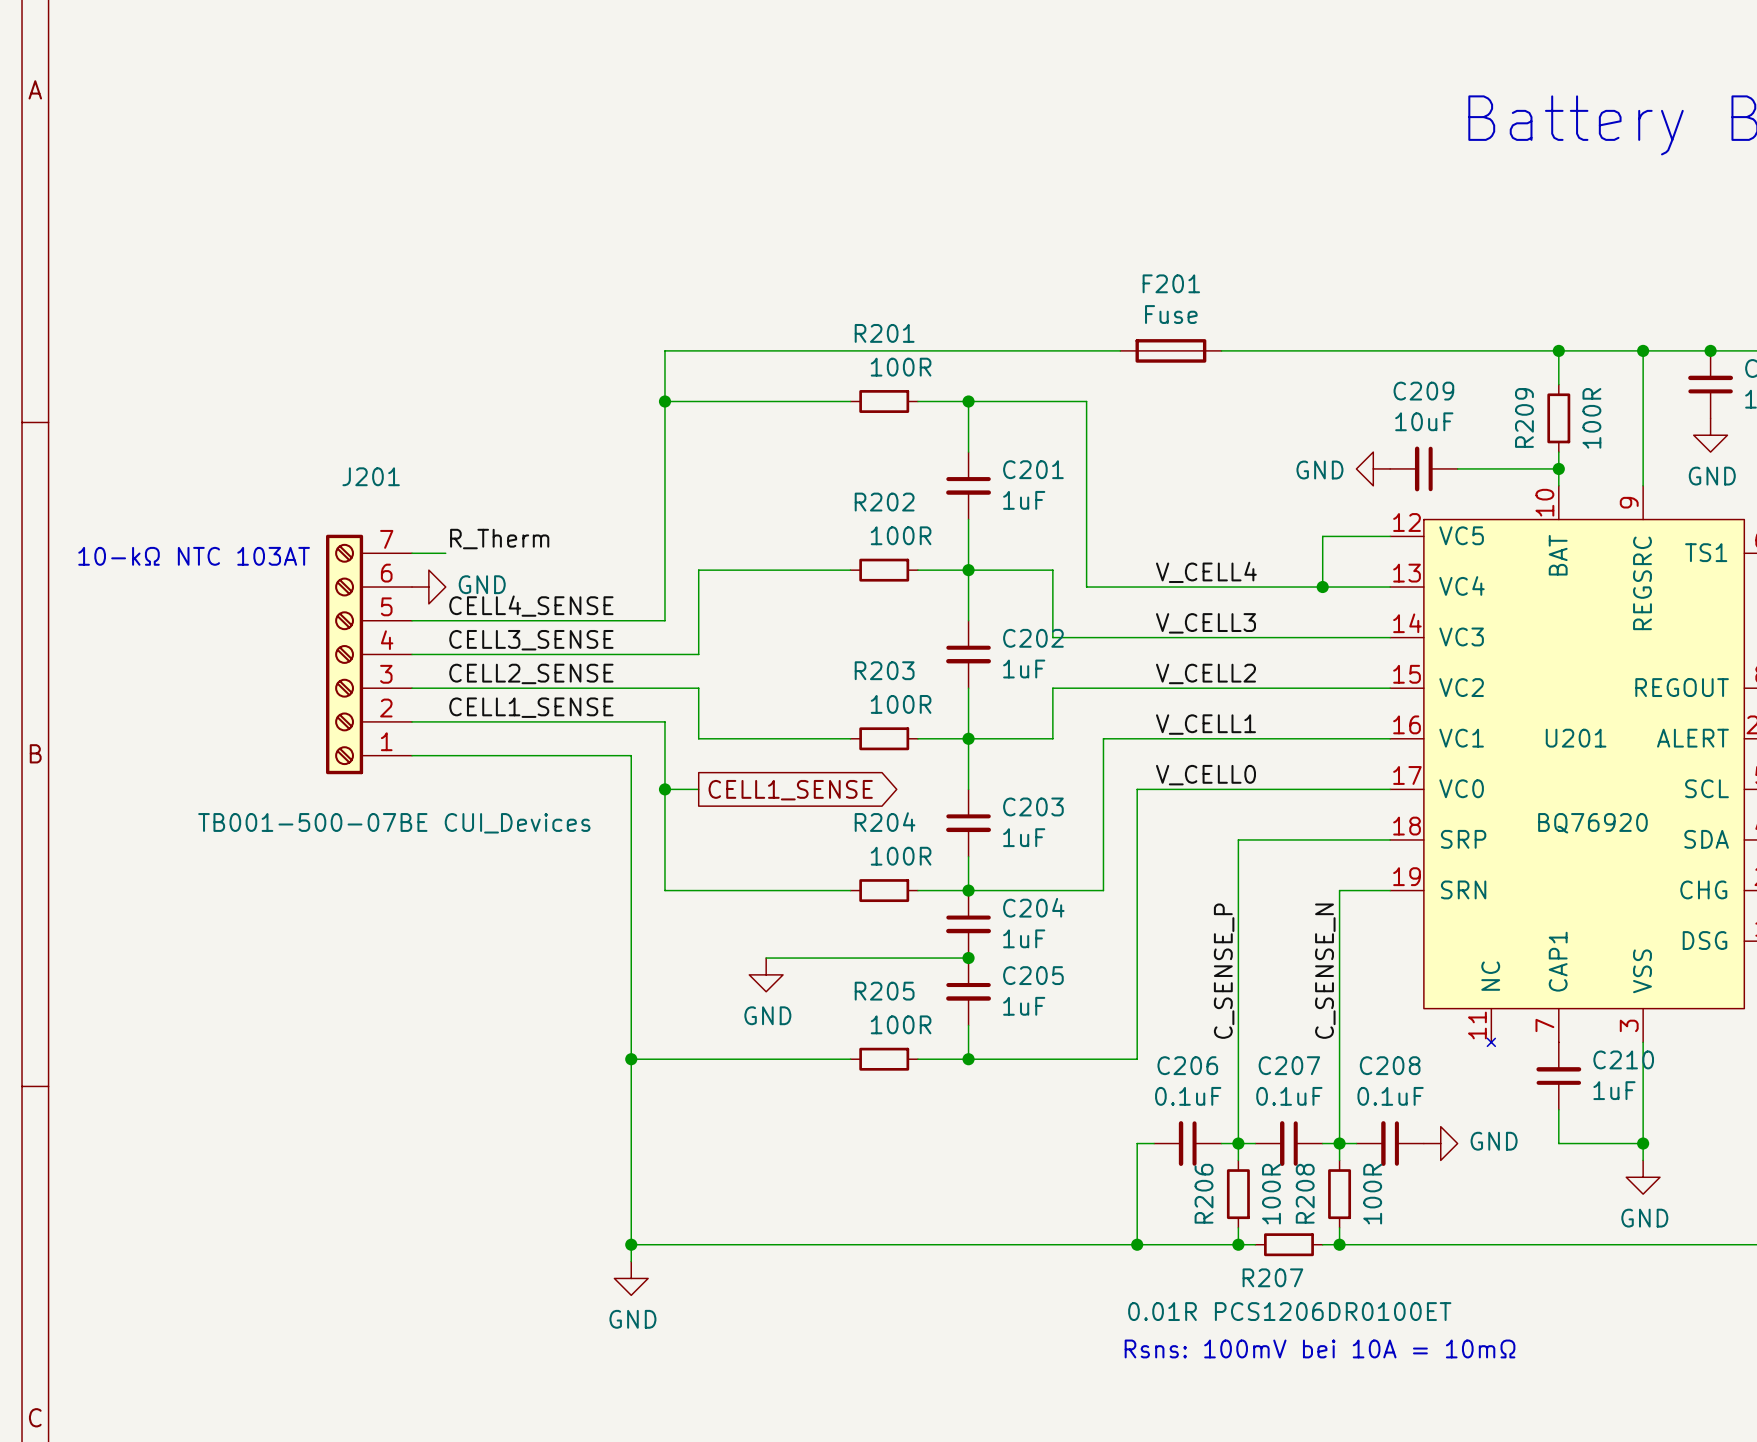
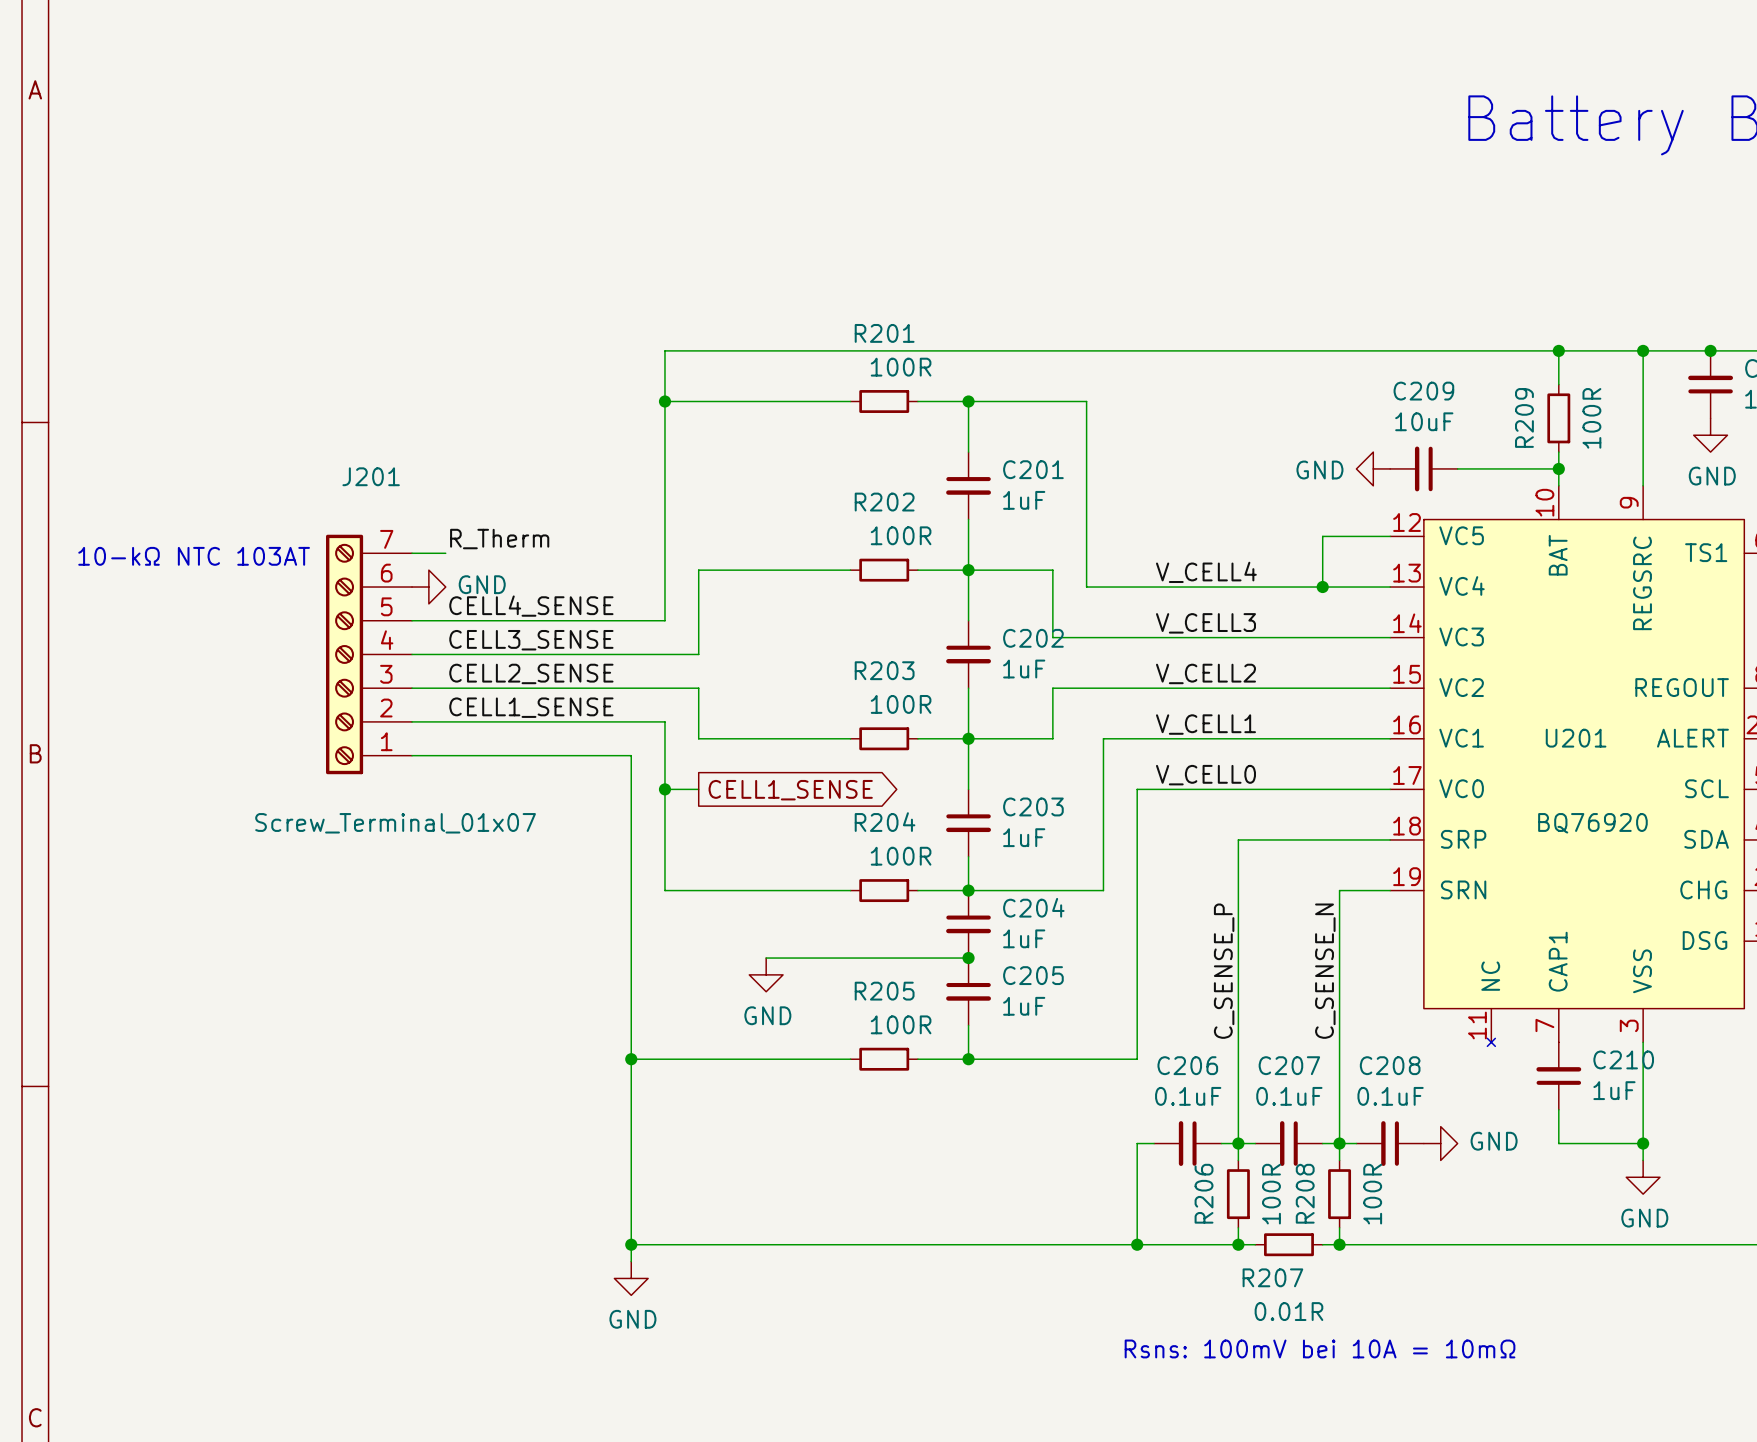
F201: Fuse (1170, 350) -> none
J201 value: TB001-500-07BE CUI_Devices (394, 823) -> Screw_Terminal_01x07 (395, 823)
R207 value: 0.01R PCS1206DR0100ET (1289, 1311) -> 0.01R (1288, 1311)

